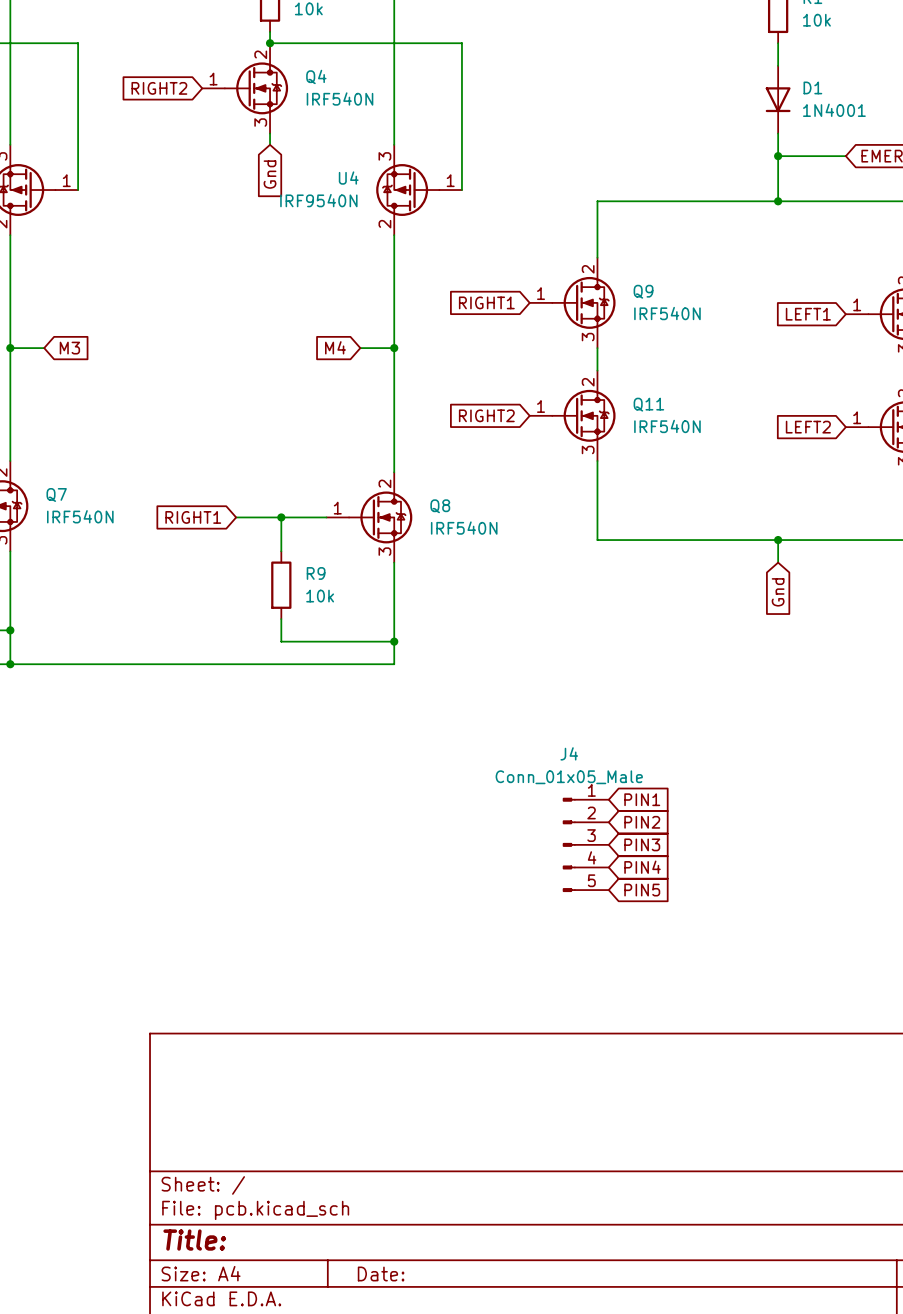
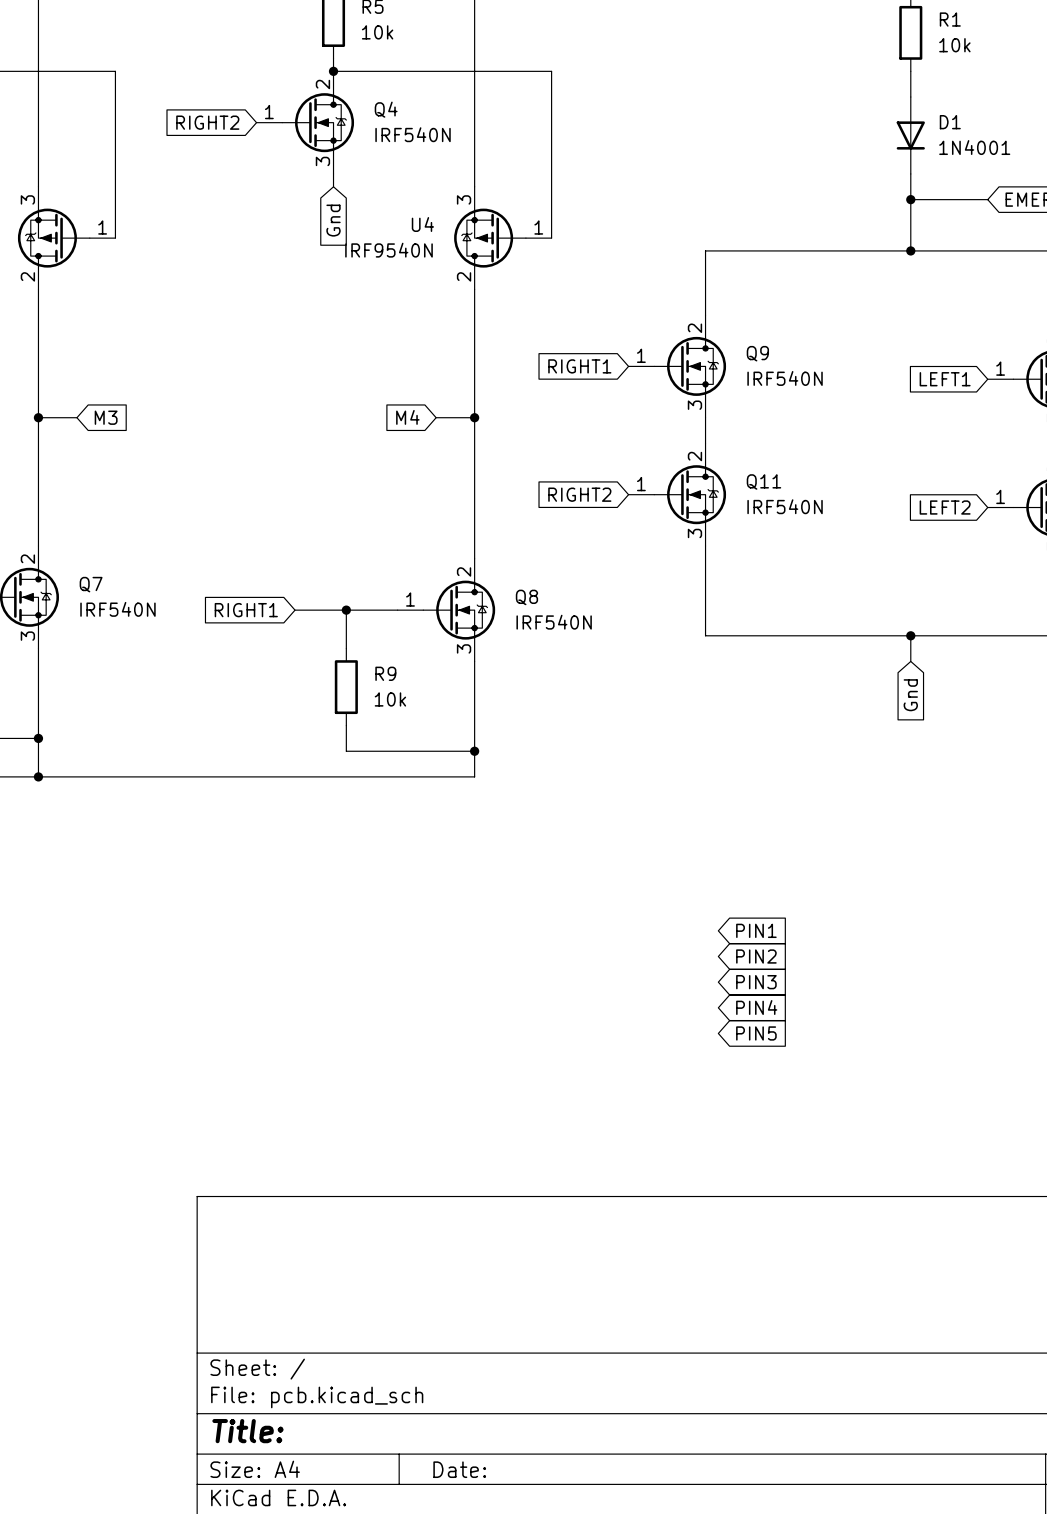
J4: Conn_01x05_Male (585, 844) -> none

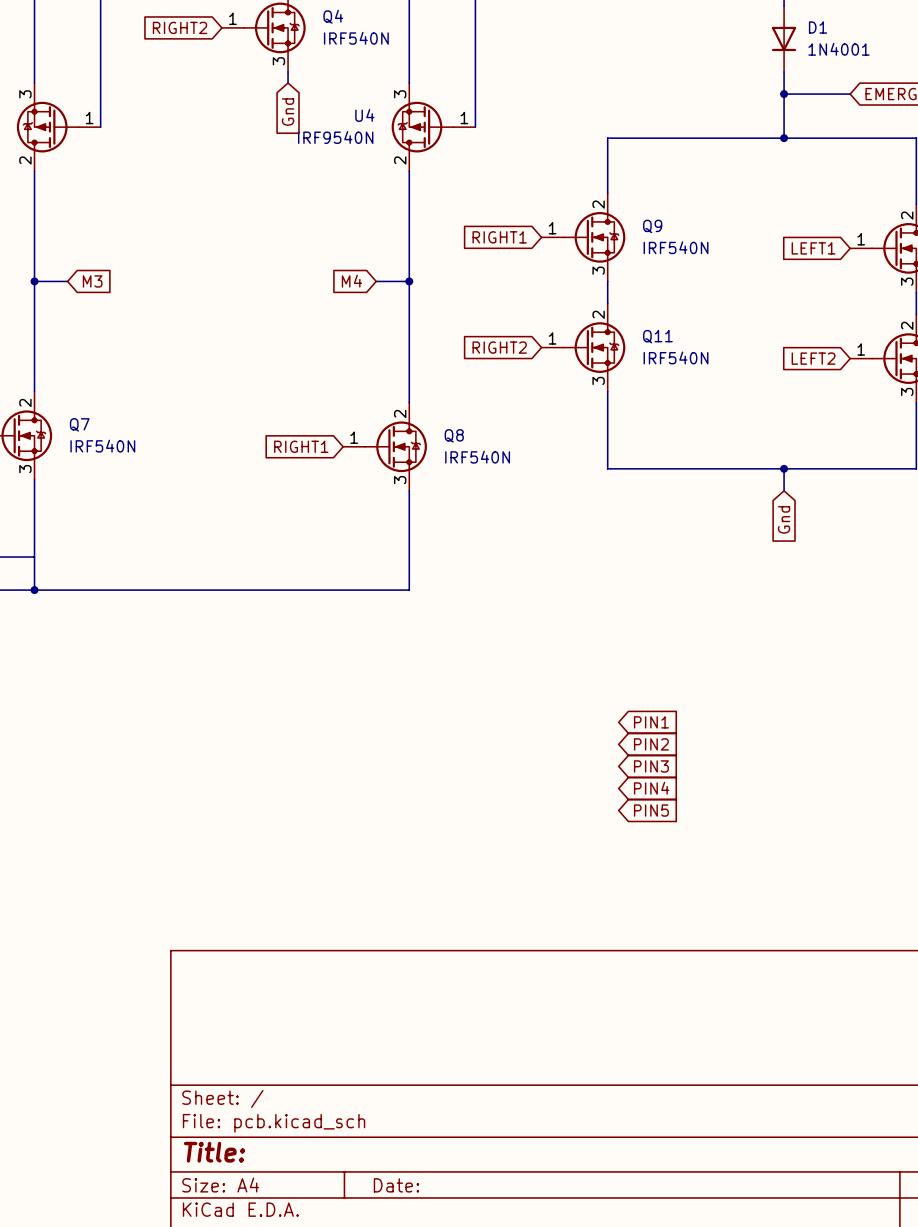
global label position: RIGHT1 (246, 610) -> RIGHT1 (301, 446)
wire: (295, 610) (397, 610) -> none
wire: (346, 610) (346, 648) -> none
junction: (346, 610) -> none
R9: 10k (346, 687) -> none
wire: (346, 725) (346, 751) (474, 751) -> none
junction: (38, 738) -> none
junction: (474, 751) -> none

